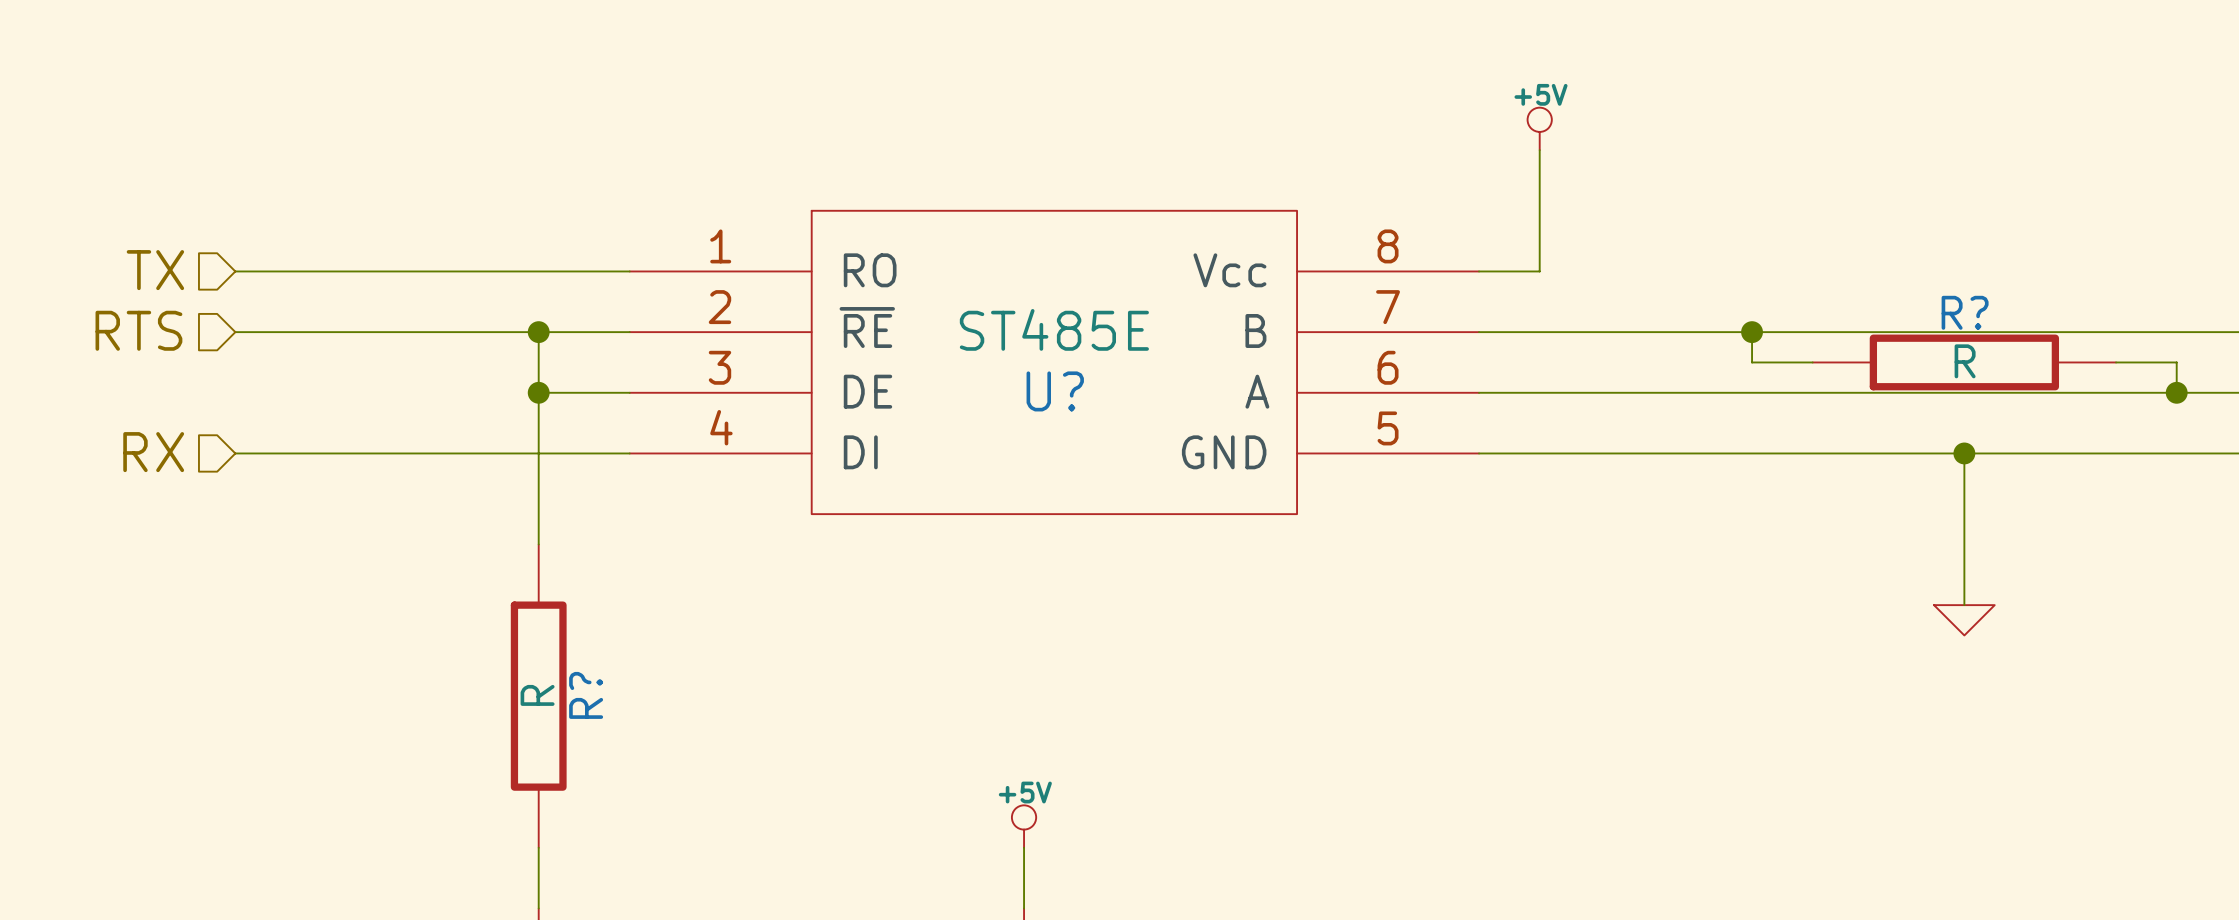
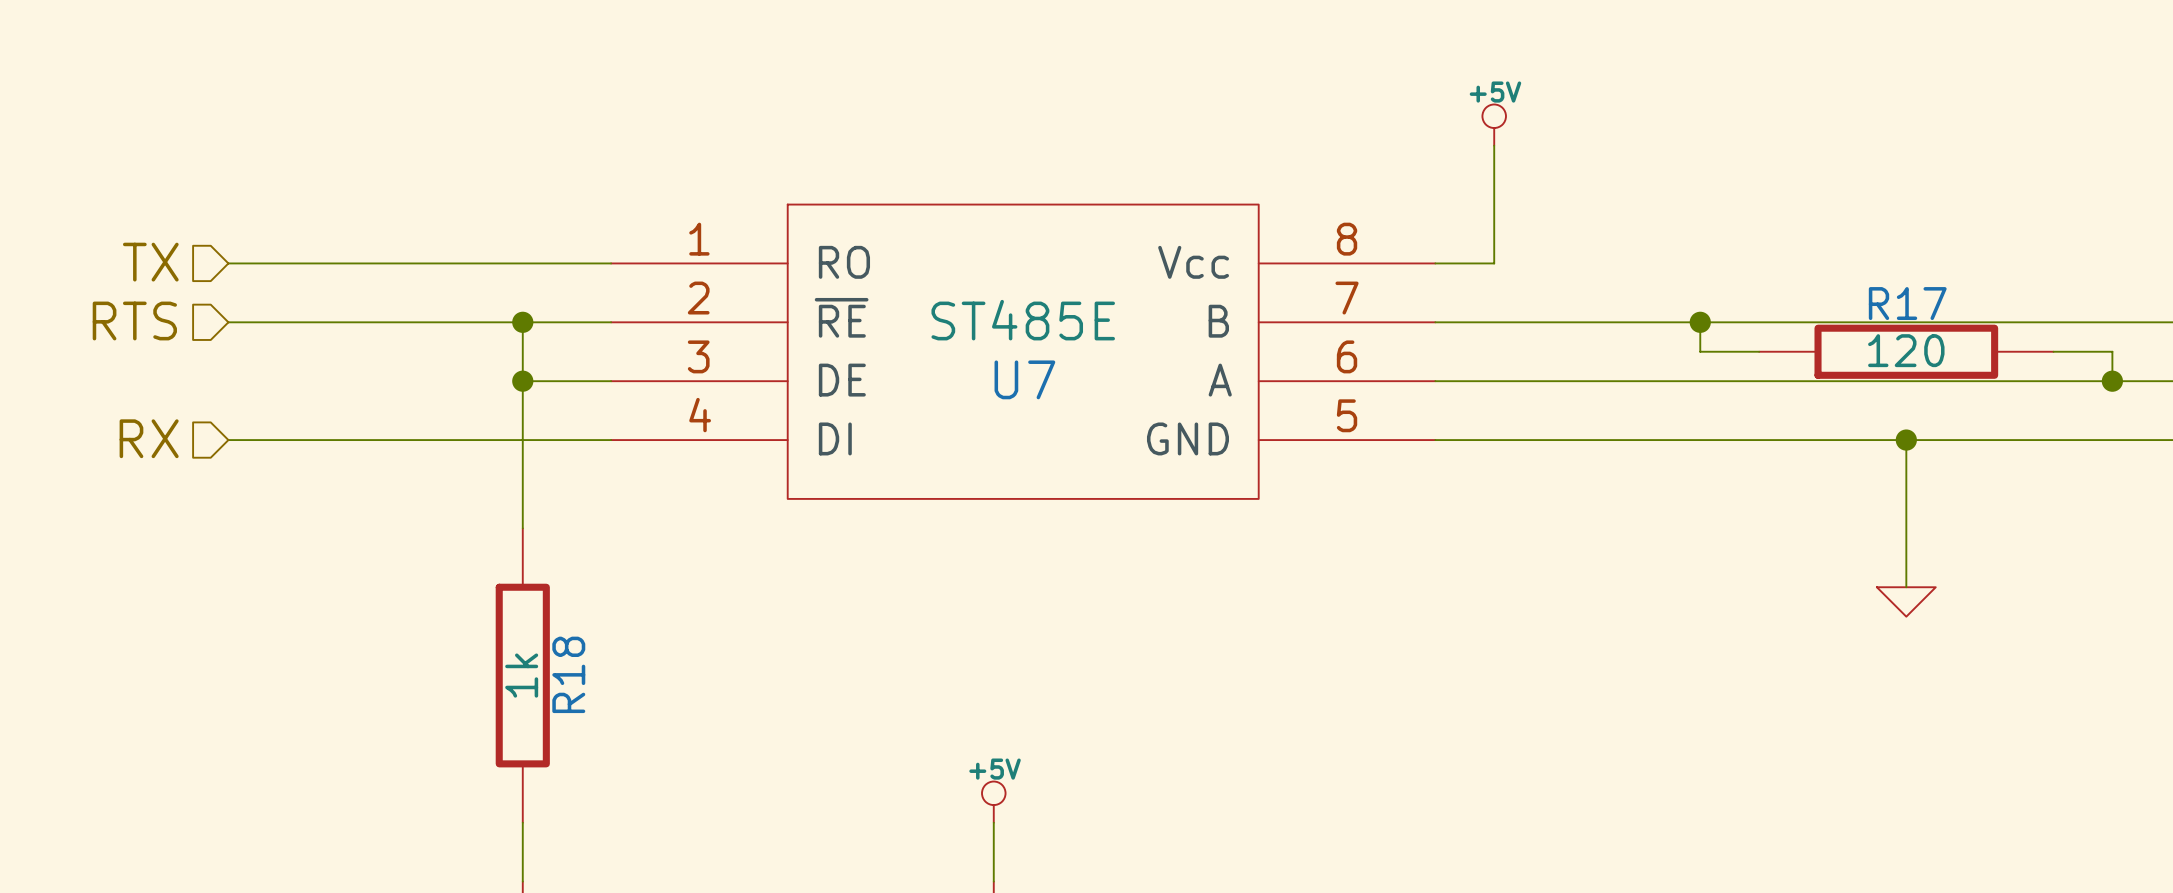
R? name: R? (1965, 312) -> R17 (1907, 303)
R? value: R (1965, 361) -> 120 (1906, 350)
U? name: U? (1055, 391) -> U7 (1024, 379)
R? value: R (537, 695) -> 1k (521, 675)
R? name: R? (586, 695) -> R18 (568, 674)

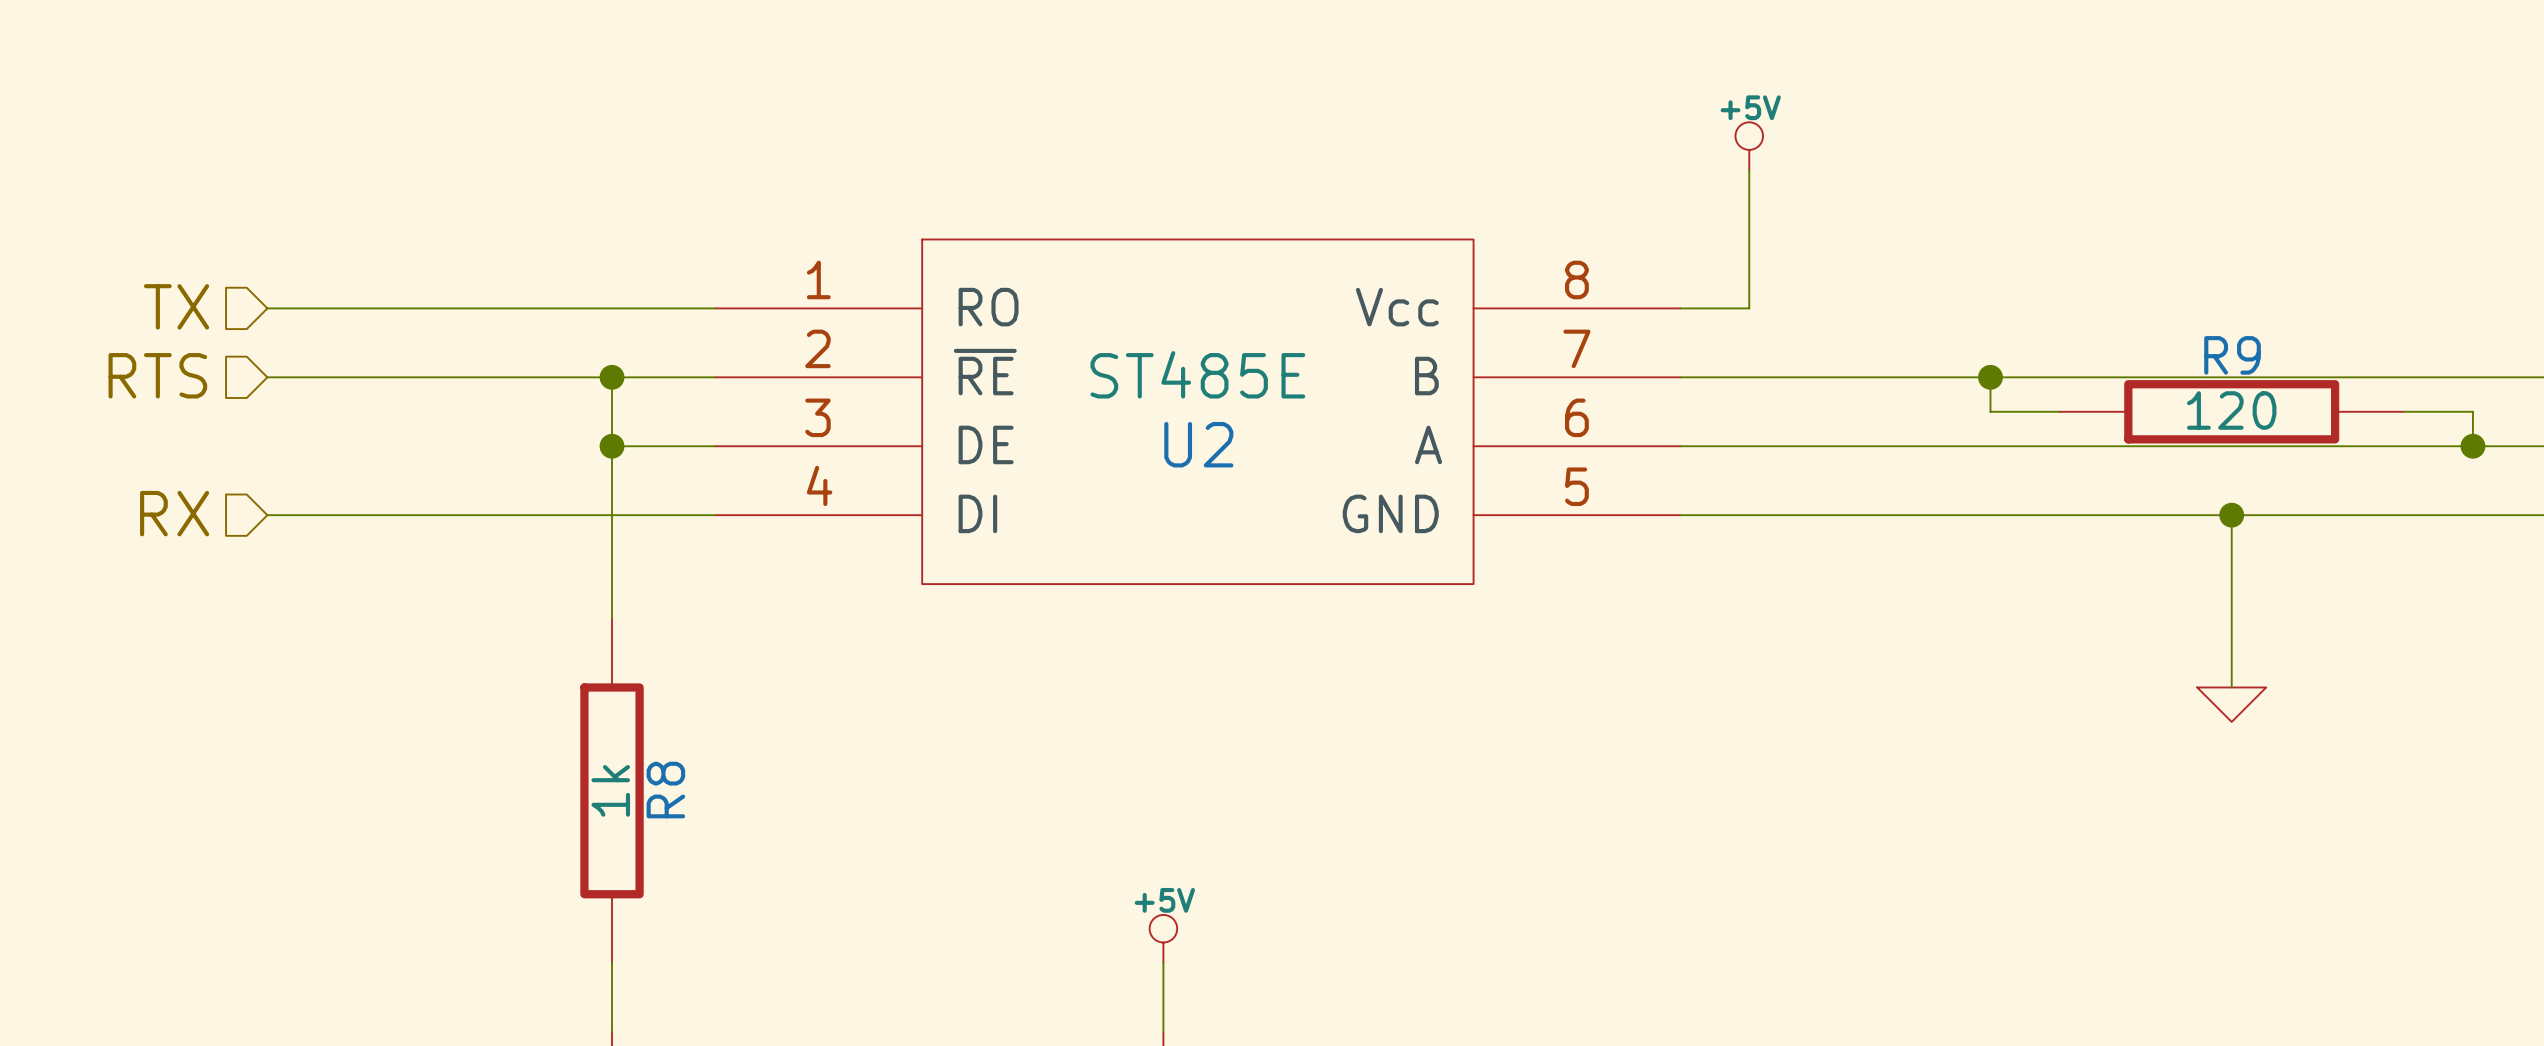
R17 name: R17 (1907, 303) -> R9 (2232, 355)
U7 name: U7 (1024, 379) -> U2 (1198, 444)
R18 name: R18 (568, 674) -> R8 (665, 790)

